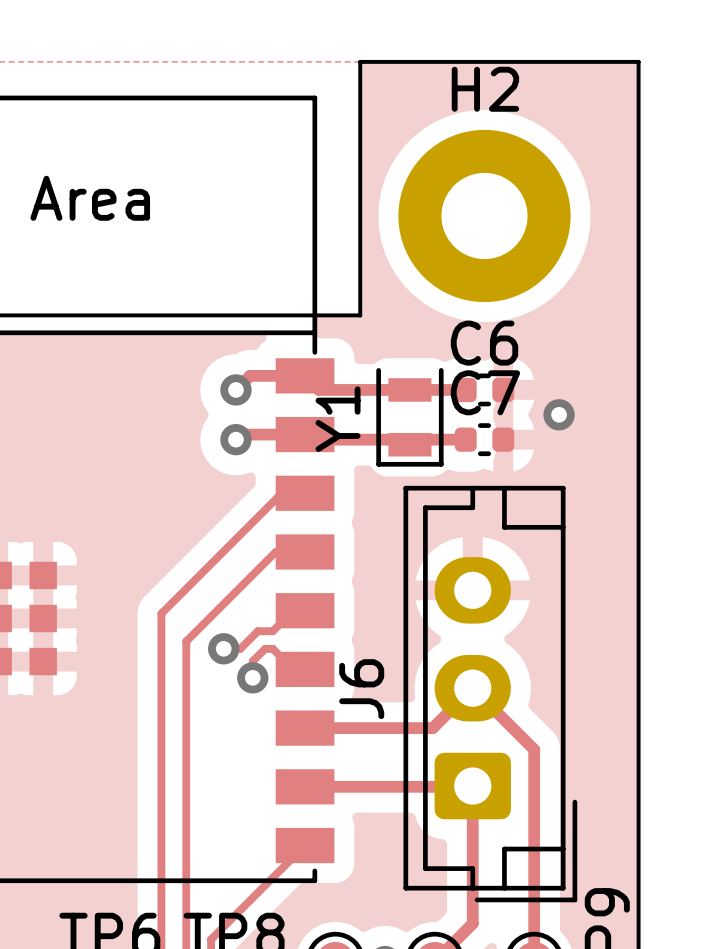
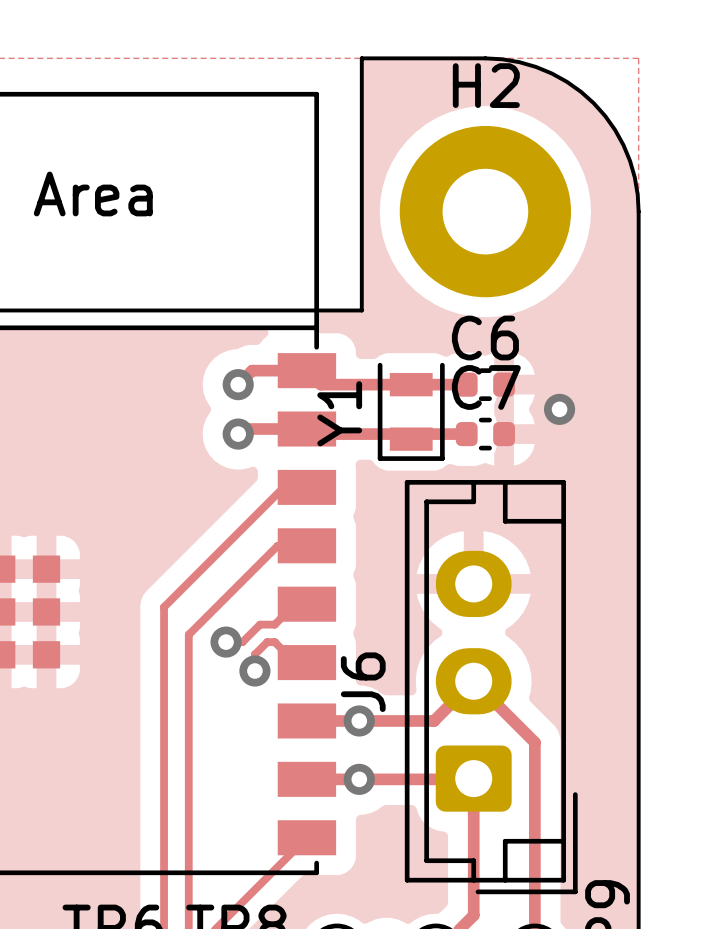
board edge: (484, 61) (638, 61) (638, 215) -> (485, 58) (519, 62) (536, 66) (566, 81) (593, 103) (605, 116) (623, 145) (634, 177) (638, 211)
via: none -> (359, 720)
via: none -> (359, 779)

